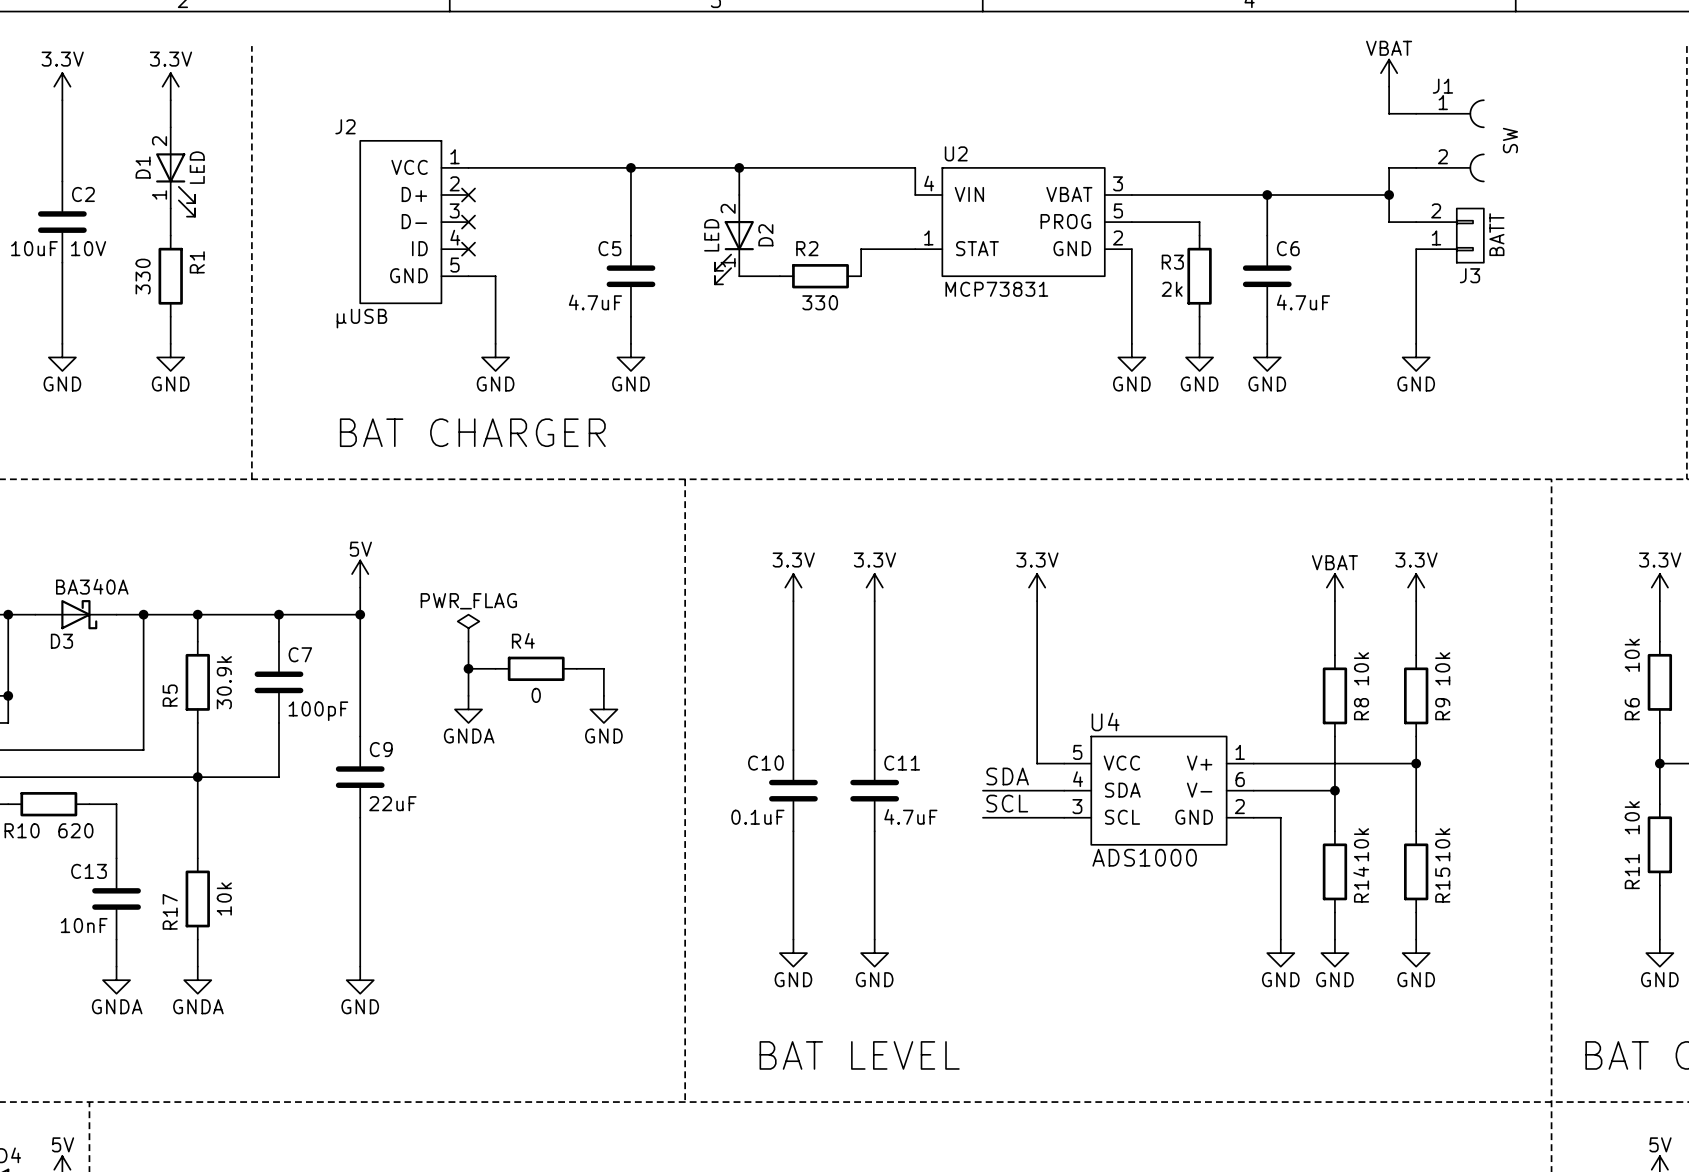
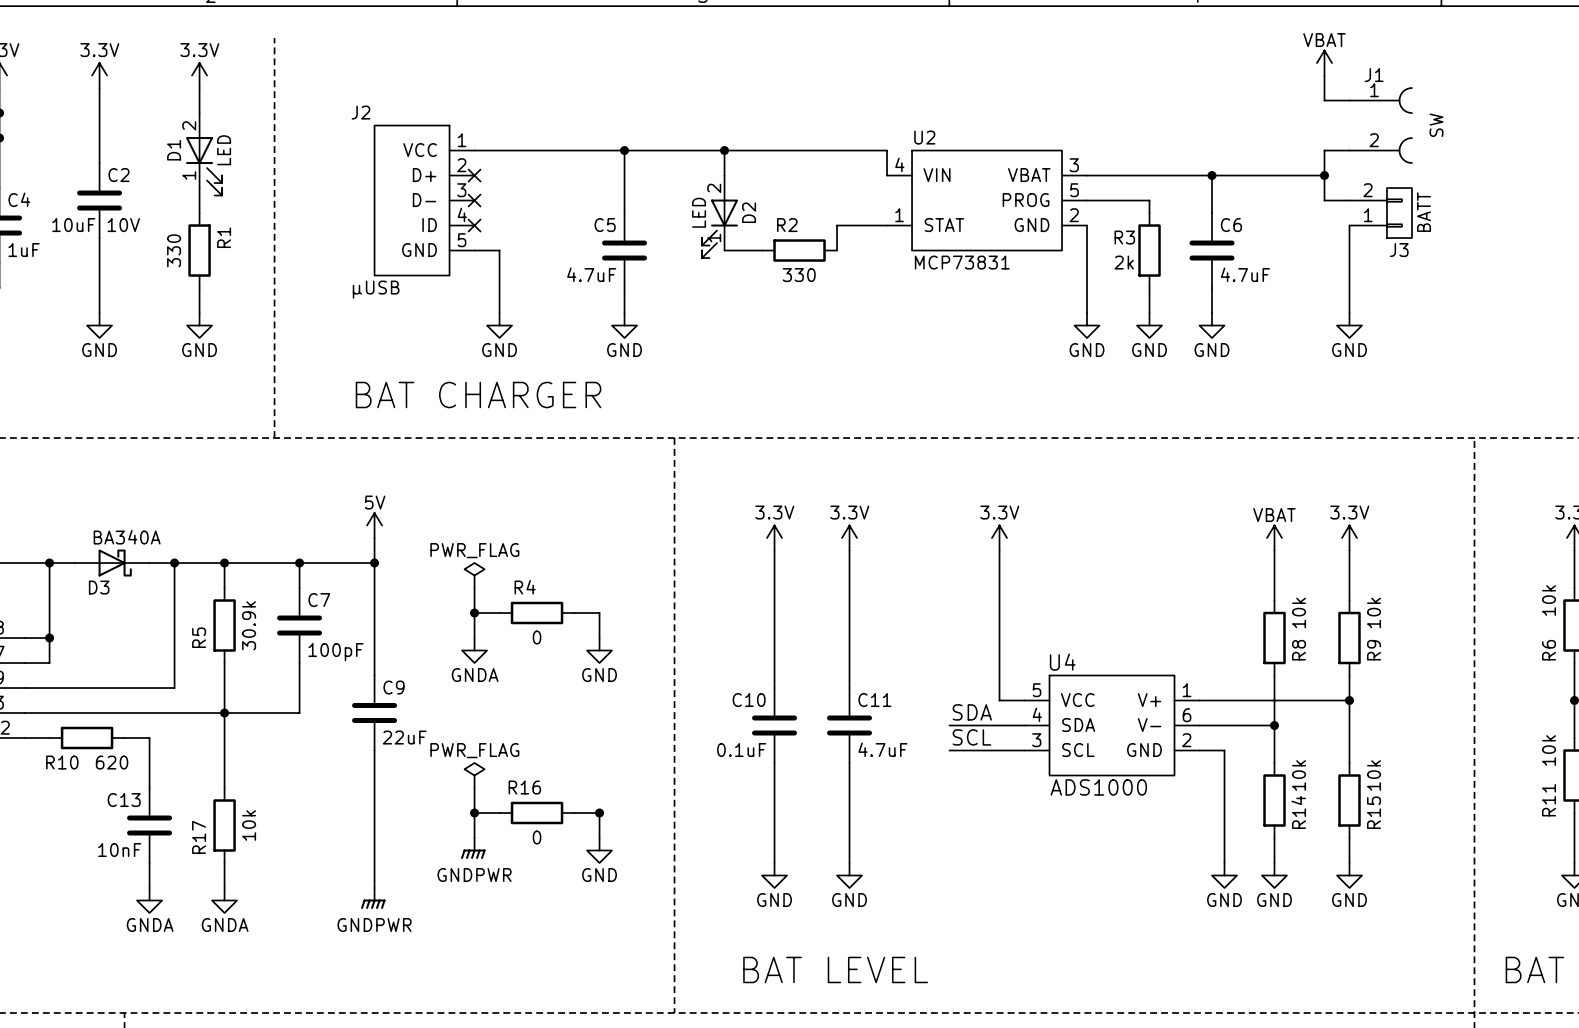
power symbol: none -> PWR_FLAG (474, 775)
wire: none -> (474, 788) (474, 838)
wire: none -> (474, 813) (499, 813)
junction: none -> (474, 813)
R16: none -> 0 (537, 813)
wire: none -> (574, 813) (599, 813) (599, 838)
junction: none -> (599, 813)
power symbol: none -> GNDPWR (473, 848)
power symbol: none -> GND (599, 850)
power symbol: GND (360, 980) -> GNDPWR (373, 898)

